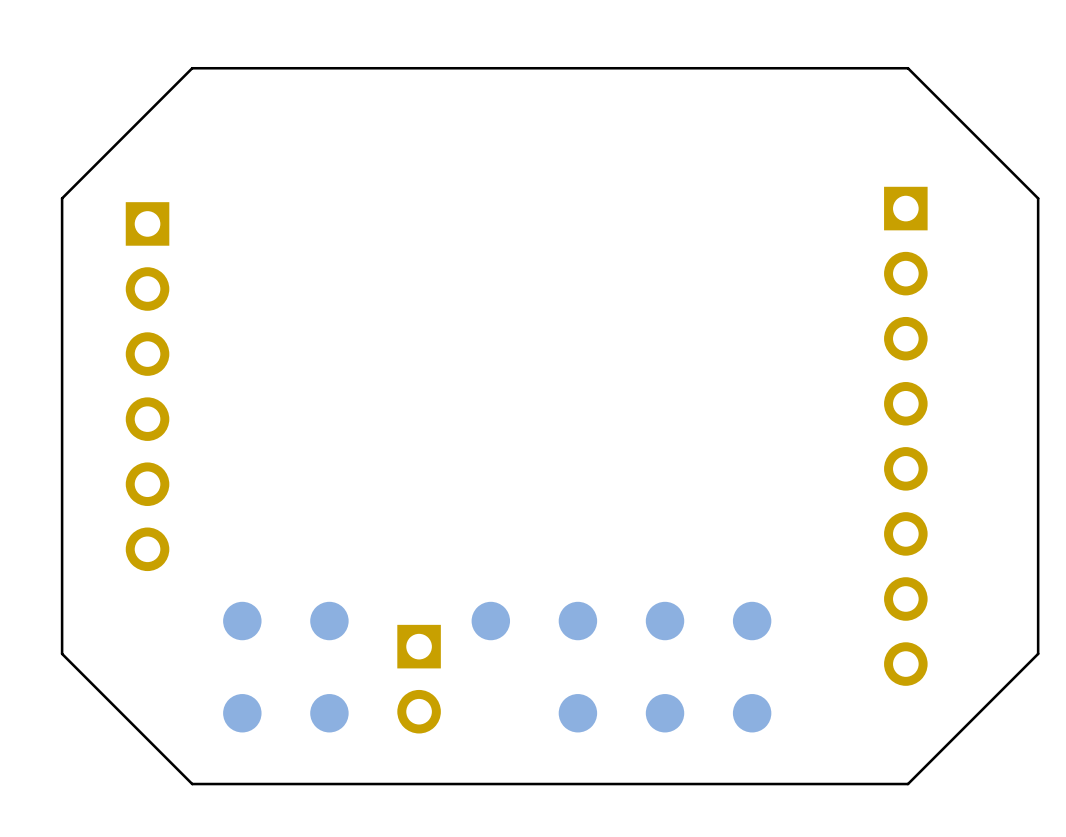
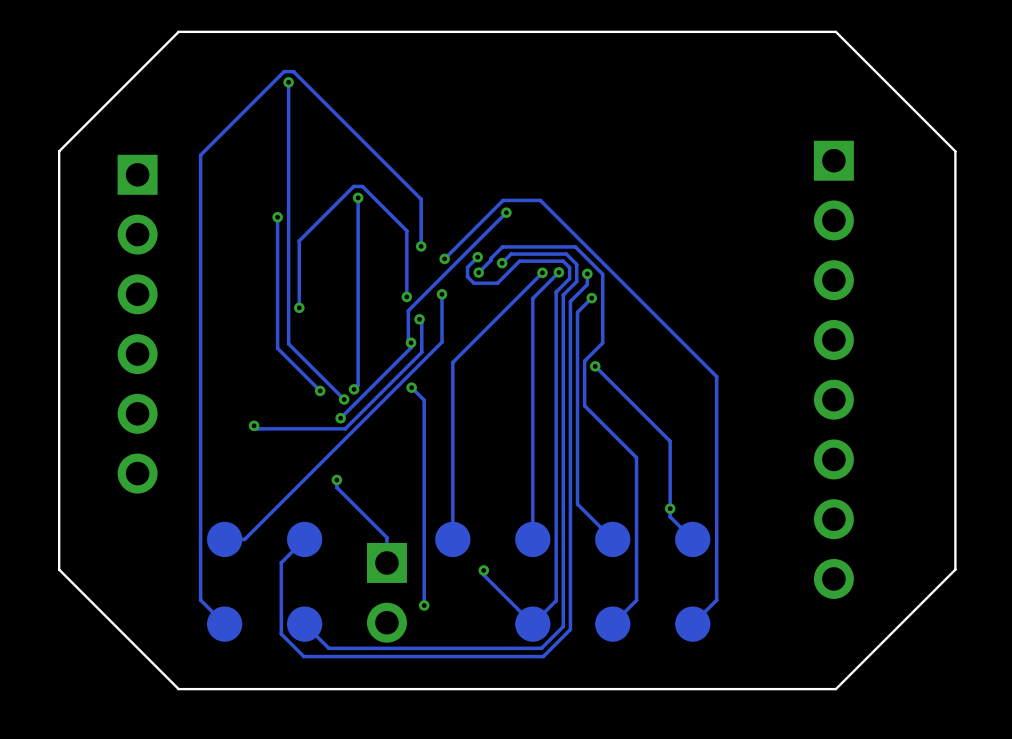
track: none -> (288, 82) (288, 343) (344, 399)
via: none -> (288, 82)
track: none -> (358, 197) (358, 385) (354, 389)
via: none -> (358, 197)
track: none -> (506, 212) (408, 310) (408, 340) (411, 342) (411, 347) (340, 418)
via: none -> (506, 212)
track: none -> (277, 217) (277, 348) (320, 390)
via: none -> (277, 217)
track: none -> (421, 246) (421, 199) (293, 71) (284, 71) (200, 155) (200, 600) (224, 624)
via: none -> (421, 246)
track: none -> (477, 257) (467, 267) (467, 276) (473, 283) (497, 283) (519, 261) (563, 261) (569, 267) (569, 278) (556, 292) (556, 600) (532, 624) (483, 575) (483, 570)
via: none -> (477, 257)
track: none -> (444, 258) (503, 200) (540, 200) (716, 376) (716, 600) (692, 624)
via: none -> (444, 258)
track: none -> (502, 263) (511, 254) (566, 254) (576, 264) (576, 281) (563, 294) (563, 626) (541, 648) (328, 648) (304, 624)
via: none -> (502, 263)
track: none -> (478, 272) (502, 246) (575, 246) (602, 274) (602, 342) (584, 361) (584, 405) (636, 457) (636, 600) (612, 624)
via: none -> (478, 272)
track: none -> (542, 272) (452, 362) (452, 539)
via: none -> (542, 272)
track: none -> (558, 272) (532, 298) (532, 539)
via: none -> (558, 272)
track: none -> (587, 273) (587, 284) (570, 301) (570, 629) (543, 656) (303, 656) (281, 634) (281, 562) (304, 539)
via: none -> (587, 273)
track: none -> (441, 294) (441, 342) (244, 539) (224, 539)
via: none -> (441, 294)
track: none -> (406, 296) (406, 230) (362, 186) (353, 186) (299, 240) (299, 307)
via: none -> (406, 296)
track: none -> (591, 298) (577, 312) (577, 504) (612, 539)
via: none -> (591, 298)
via: none -> (299, 307)
track: none -> (419, 319) (421, 321) (421, 352) (345, 428) (257, 428) (254, 425)
via: none -> (419, 319)
via: none -> (411, 342)
track: none -> (595, 366) (670, 441) (670, 516) (692, 539)
via: none -> (595, 366)
track: none -> (411, 387) (424, 400) (424, 605)
via: none -> (411, 387)
via: none -> (354, 389)
via: none -> (320, 390)
via: none -> (344, 399)
via: none -> (340, 418)
via: none -> (254, 425)
track: none -> (336, 479) (336, 487) (386, 537) (386, 562)
via: none -> (336, 479)
via: none -> (670, 508)
via: none -> (483, 570)
via: none -> (424, 605)

